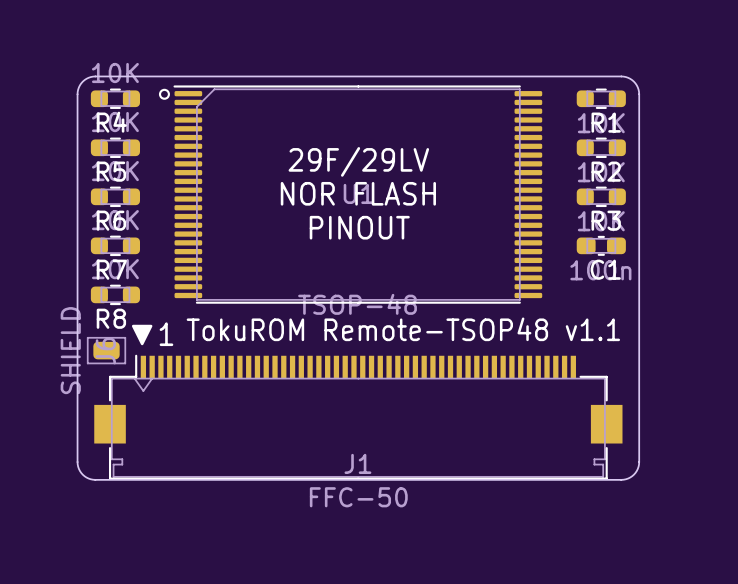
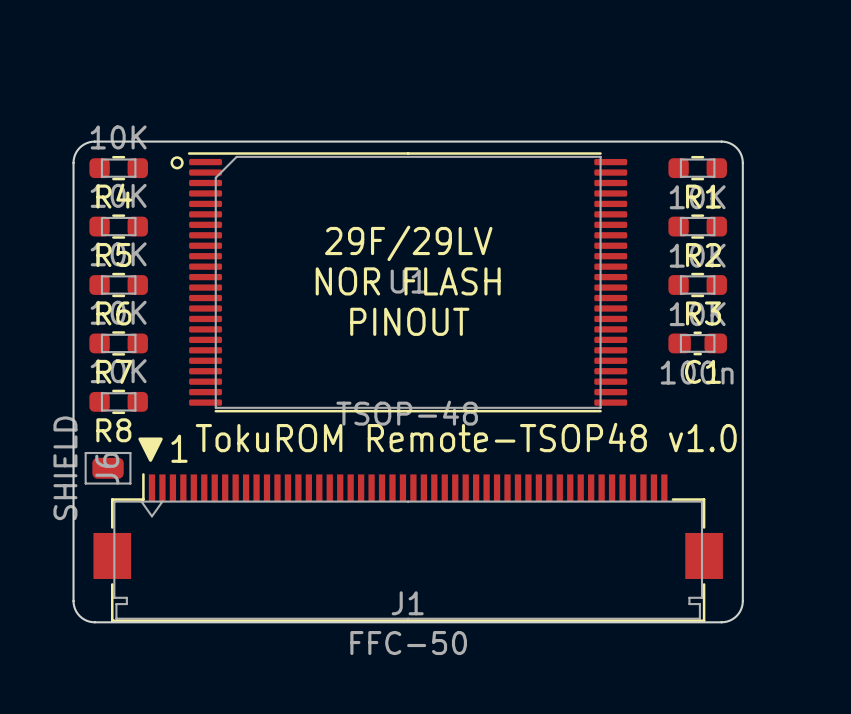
text: TokuROM Remote-TSOP48 v1.1 (403, 329) -> TokuROM Remote-TSOP48 v1.0 (466, 437)

